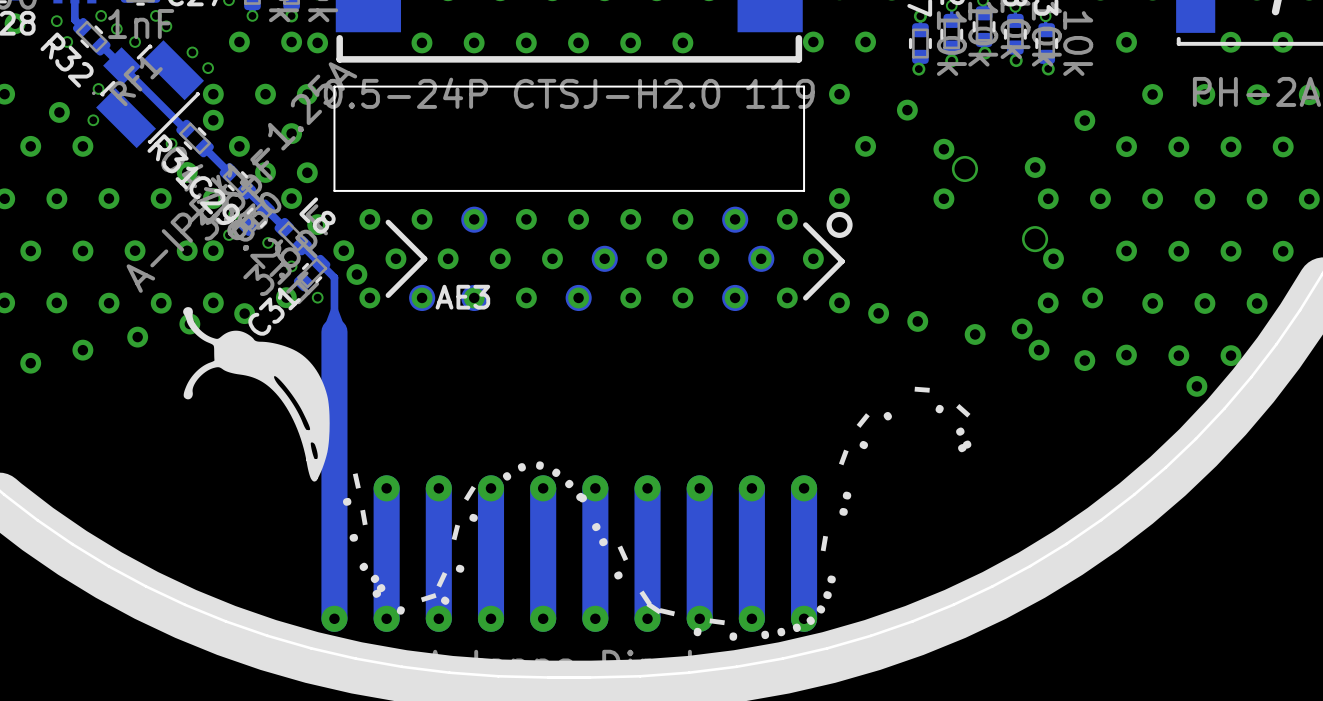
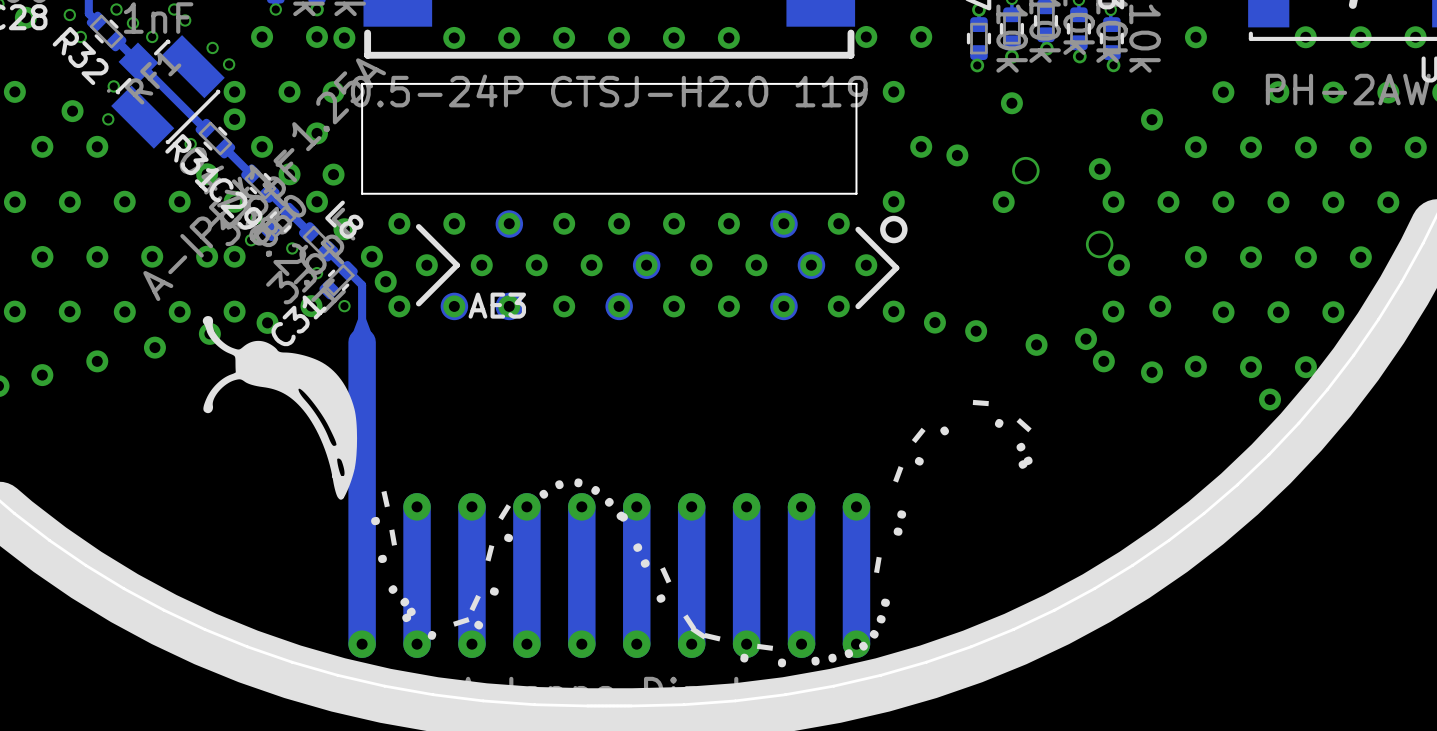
via: none -> (1011, 103)
via: (907, 110) -> none
via: (943, 149) -> none
via: none -> (957, 155)

